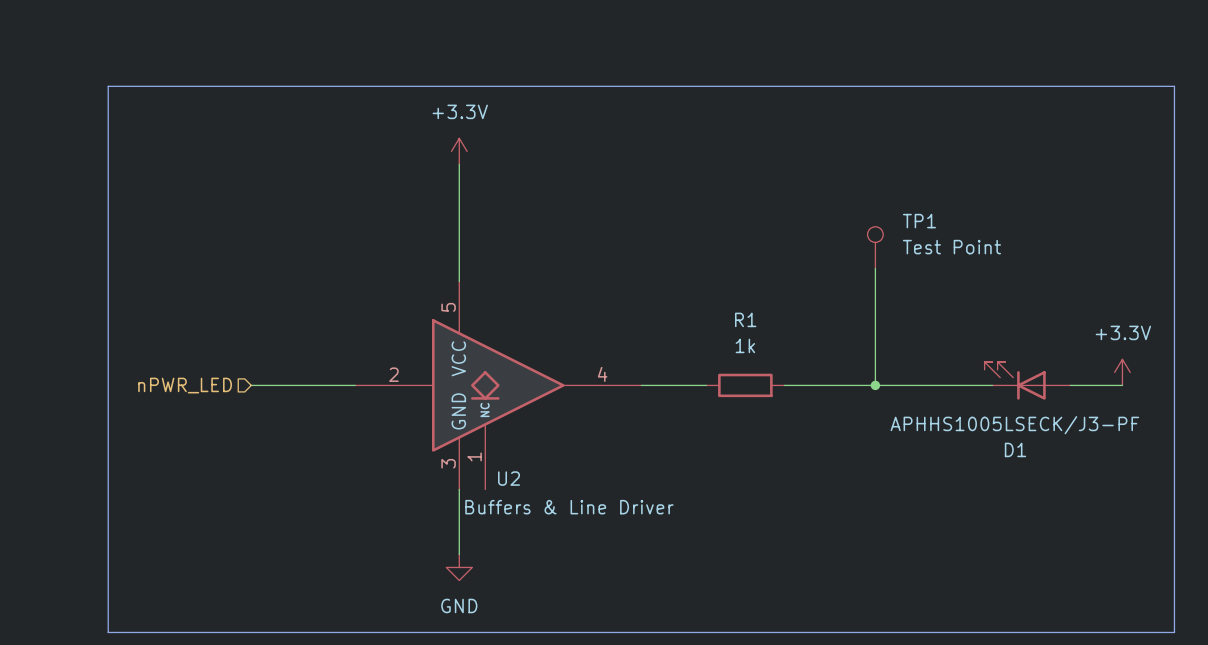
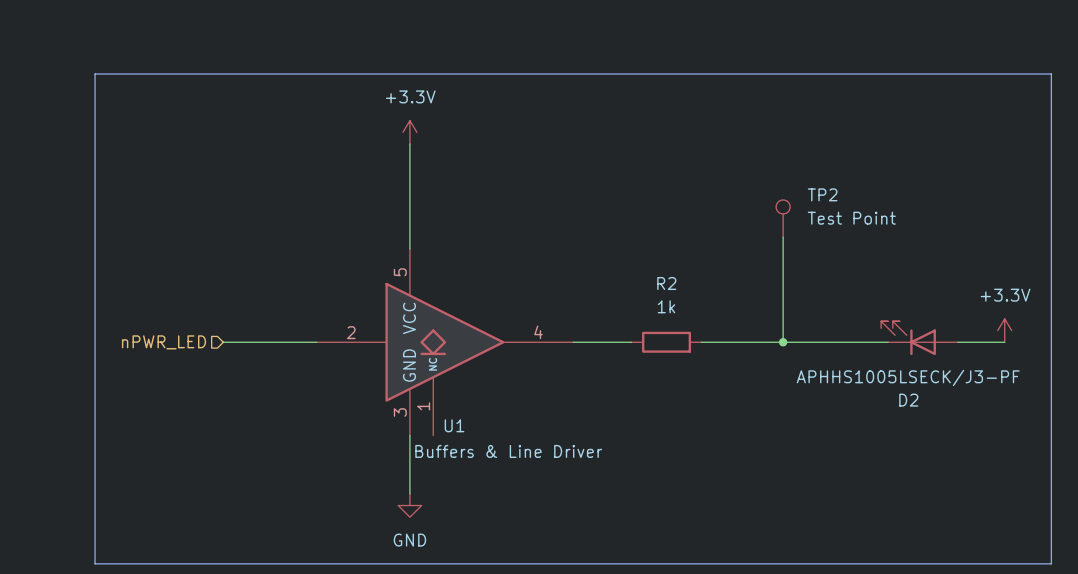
TP1 name: TP1 (919, 221) -> TP2 (822, 194)
R1 name: R1 (745, 319) -> R2 (666, 283)
D1 name: D1 (1015, 449) -> D2 (908, 400)
U2 name: U2 (509, 478) -> U1 (454, 425)

